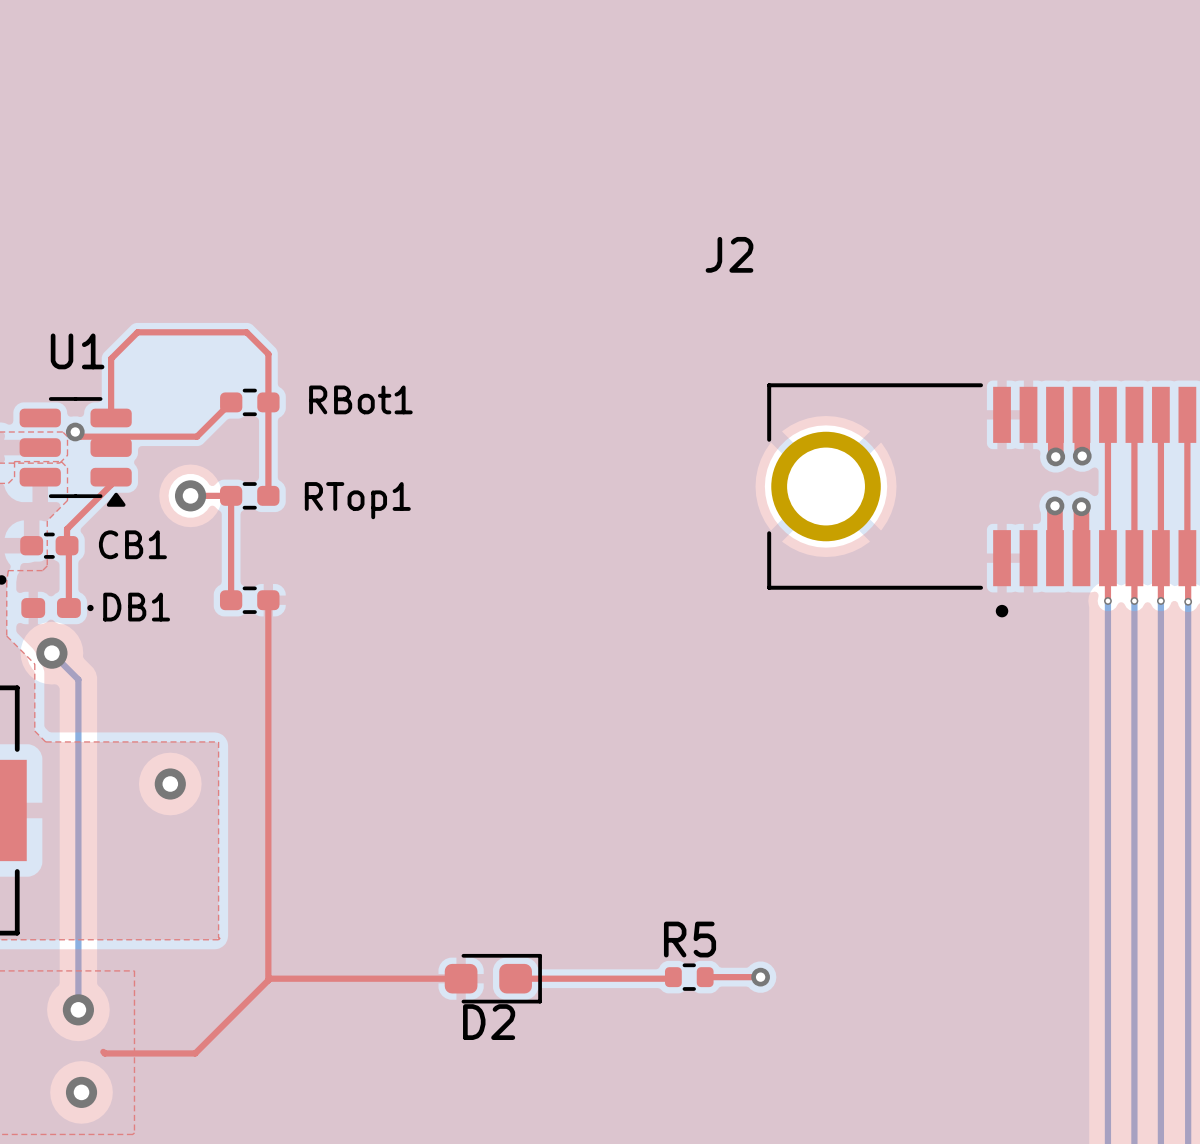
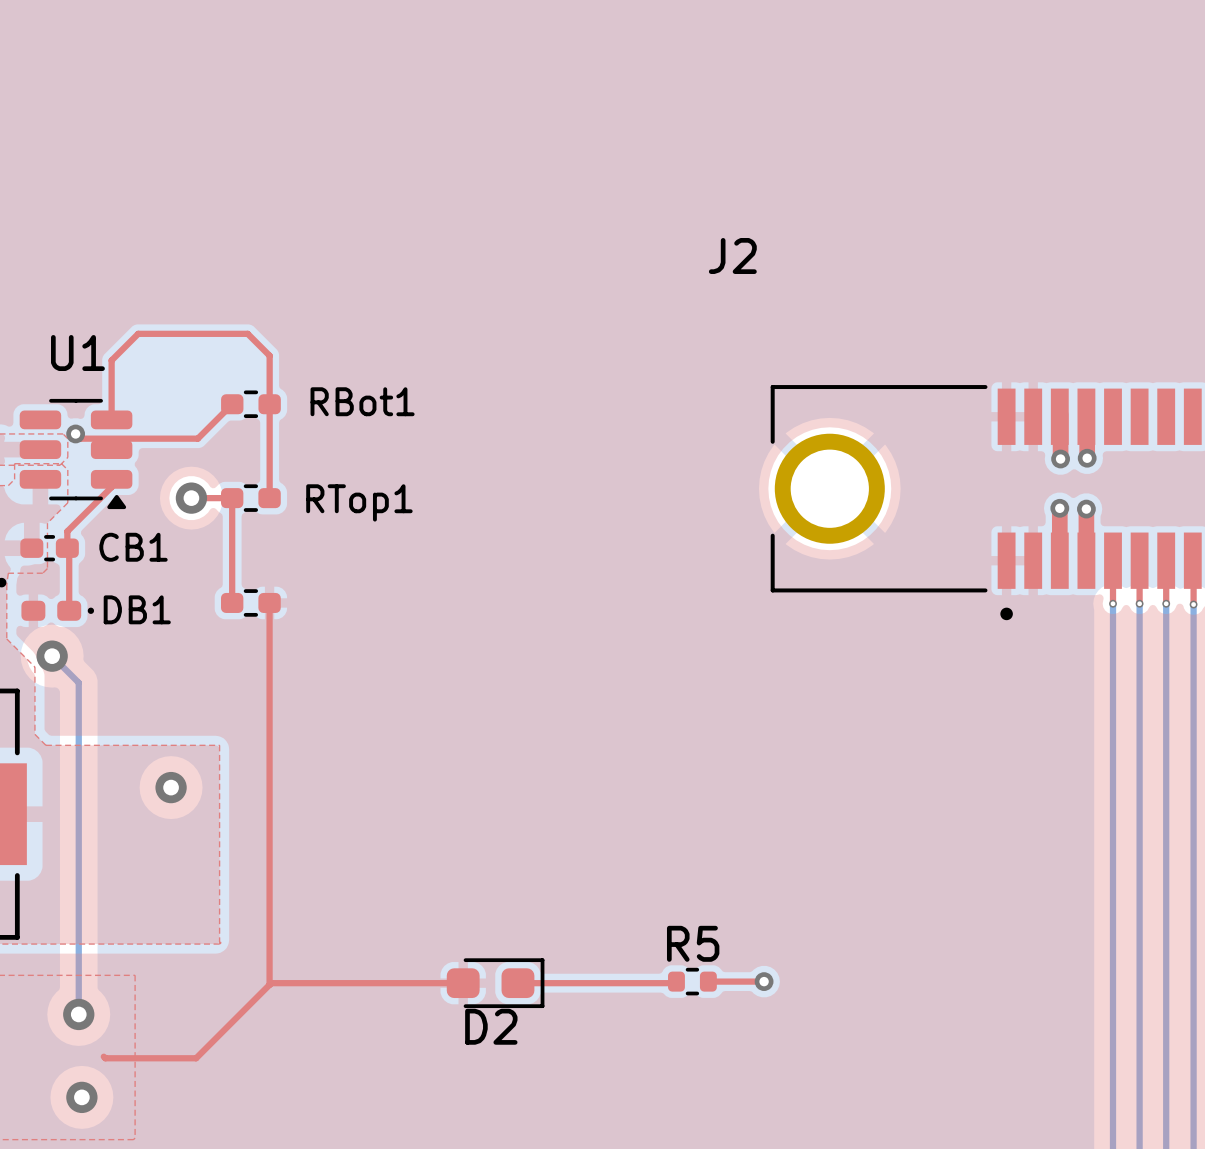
top track: (1107, 414) (1107, 558) -> none
top track: (1134, 414) (1134, 558) -> none
top track: (1160, 414) (1160, 558) -> none
top track: (1187, 414) (1188, 558) -> none

